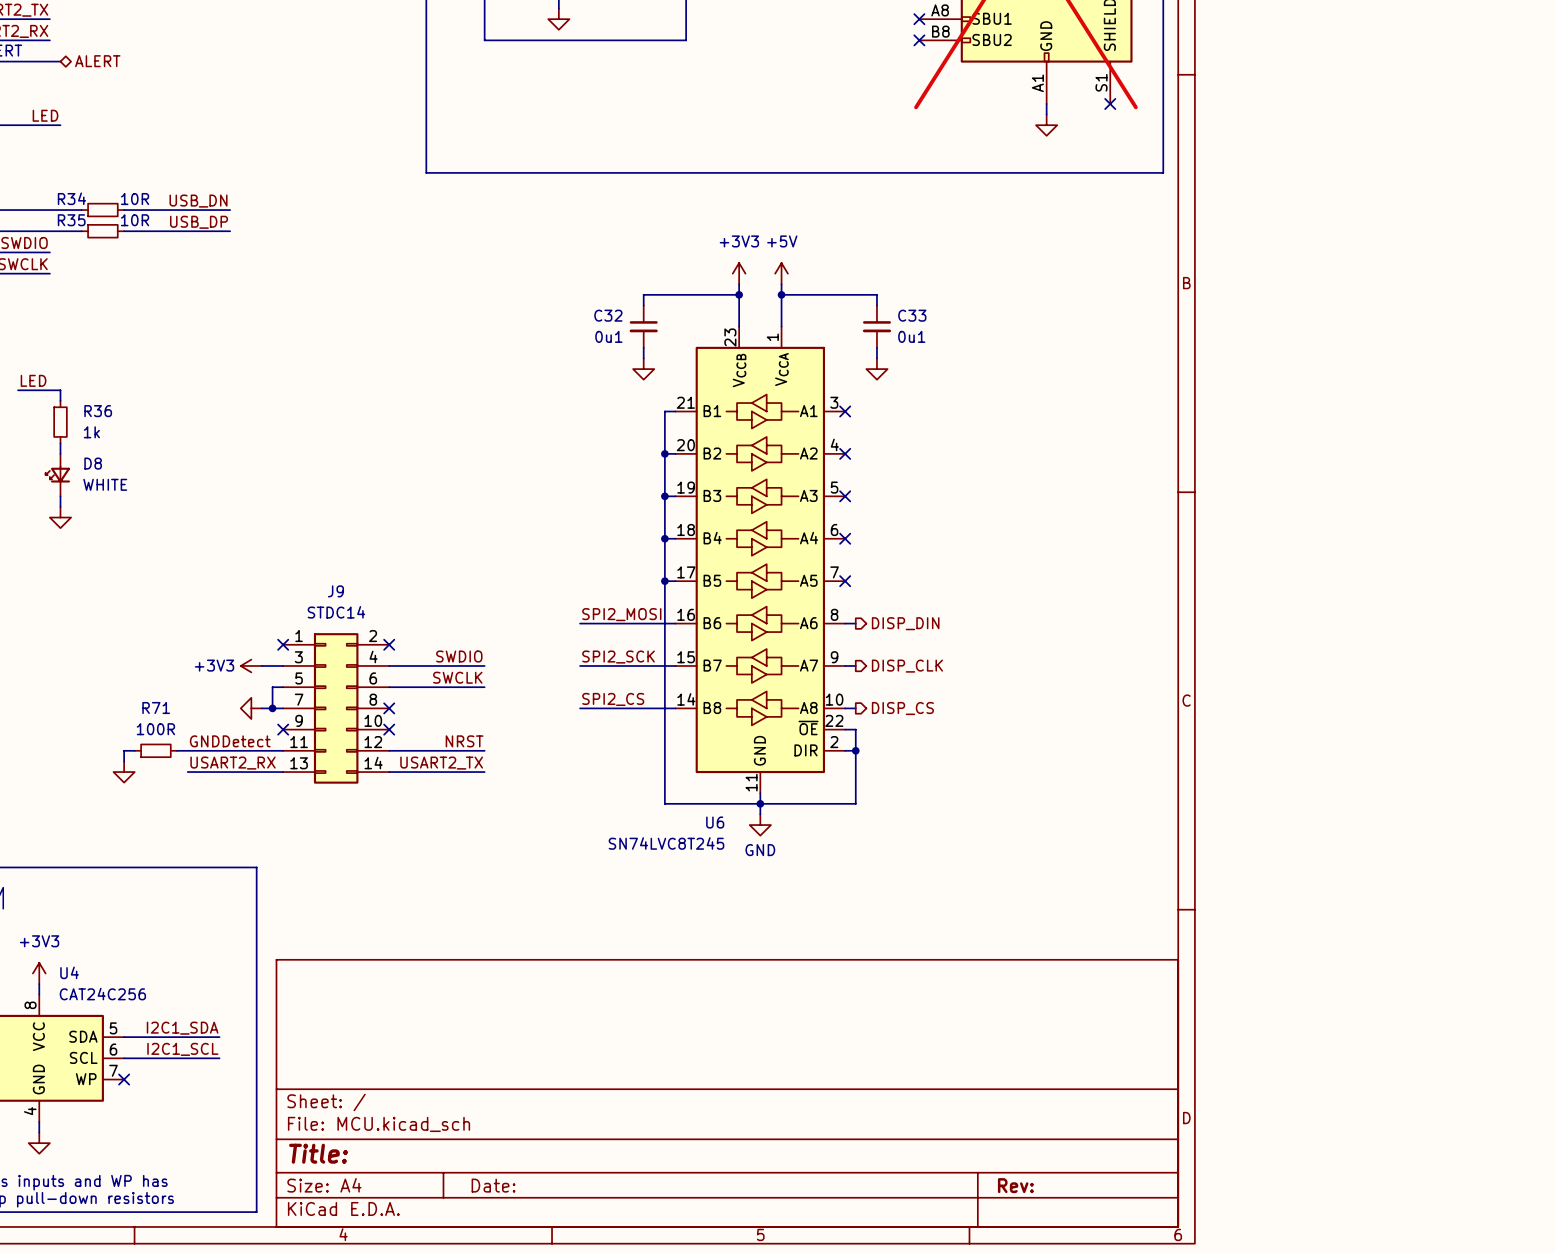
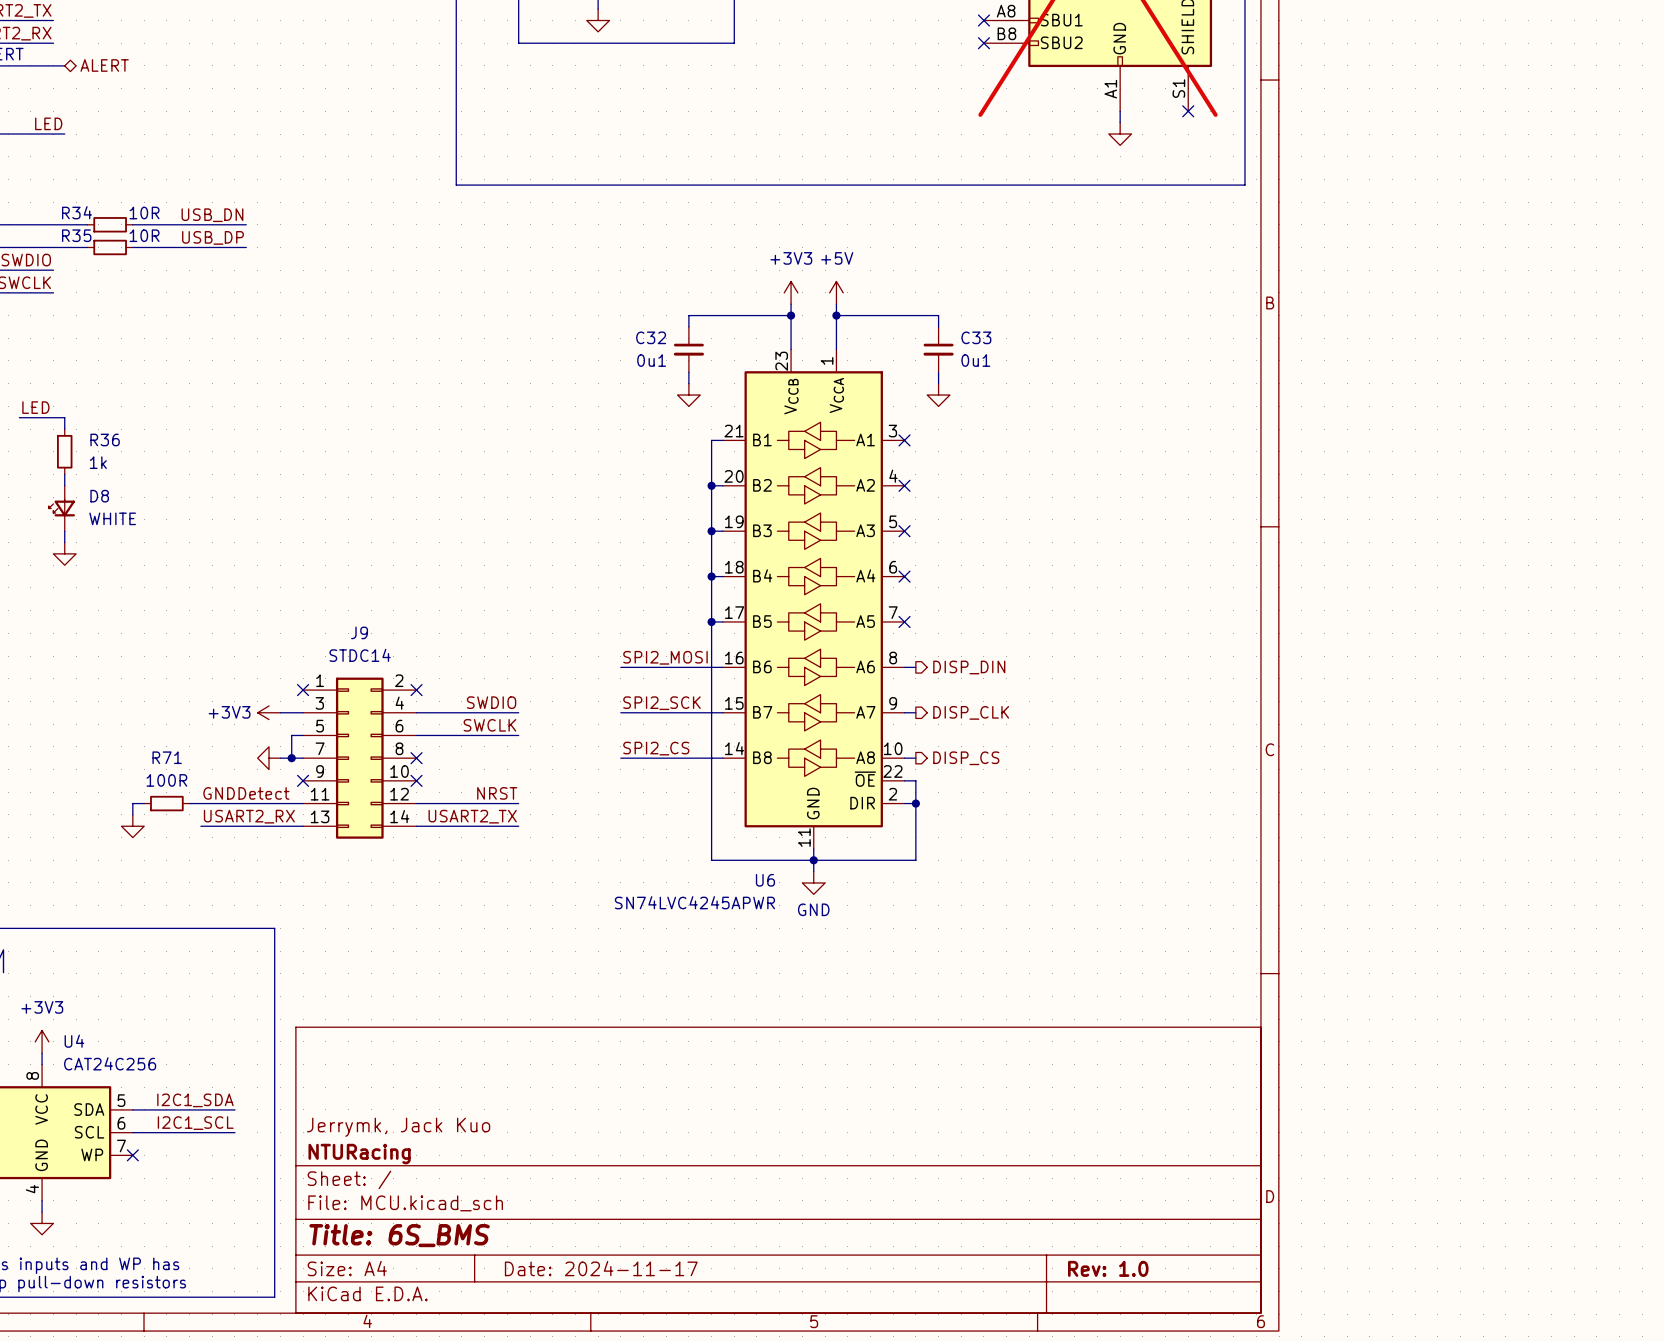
U6 value: SN74LVC8T245 (666, 843) -> SN74LVC4245APWR (694, 902)
title block: none -> Jerrymk, Jack Kuo (398, 1127)
title block: none -> NTURacing (359, 1154)
title block: Title: (318, 1153) -> Title: 6S_BMS (399, 1235)
title block: Date: (493, 1185) -> Date: 2024-11-17 (601, 1268)
title block: Rev: (1015, 1185) -> Rev: 1.0 (1108, 1268)

